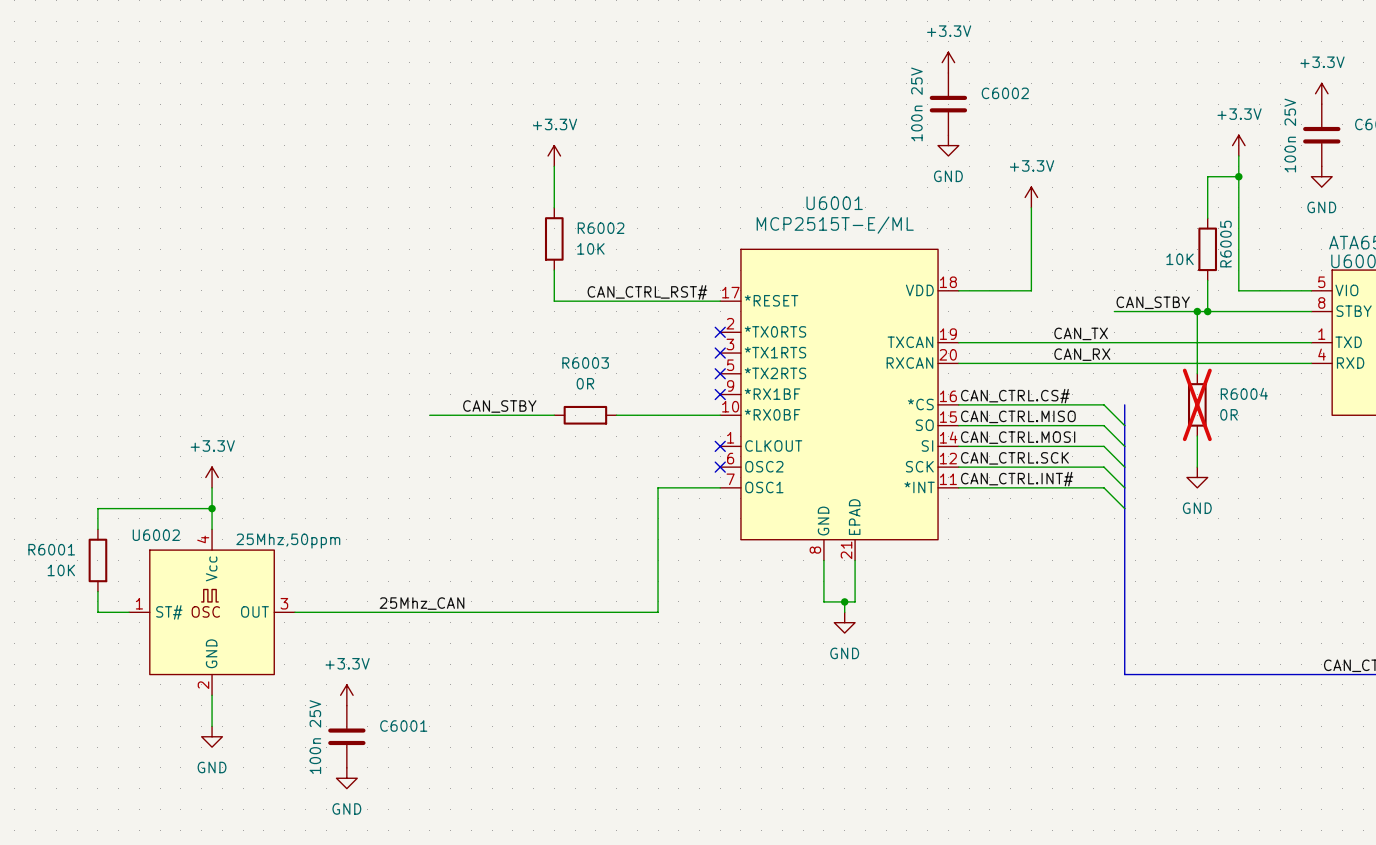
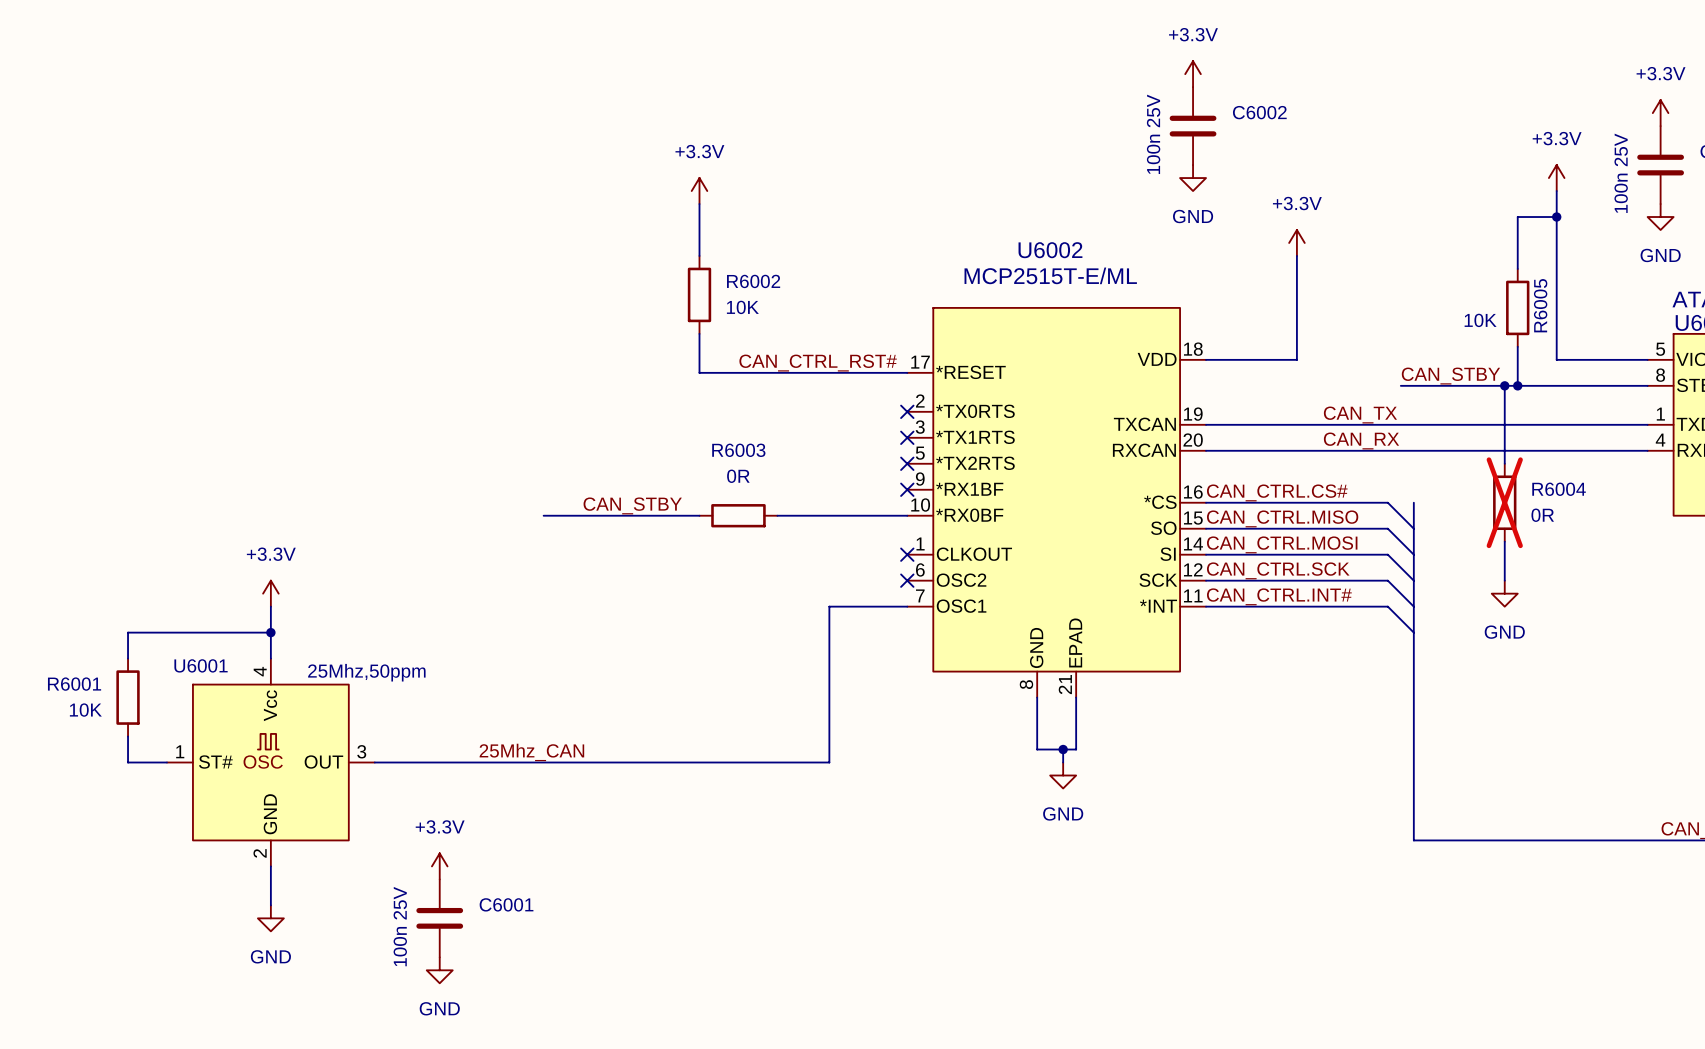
U6001 name: U6001 (834, 203) -> U6002 (1050, 250)
U6002 name: U6002 (156, 535) -> U6001 (201, 665)

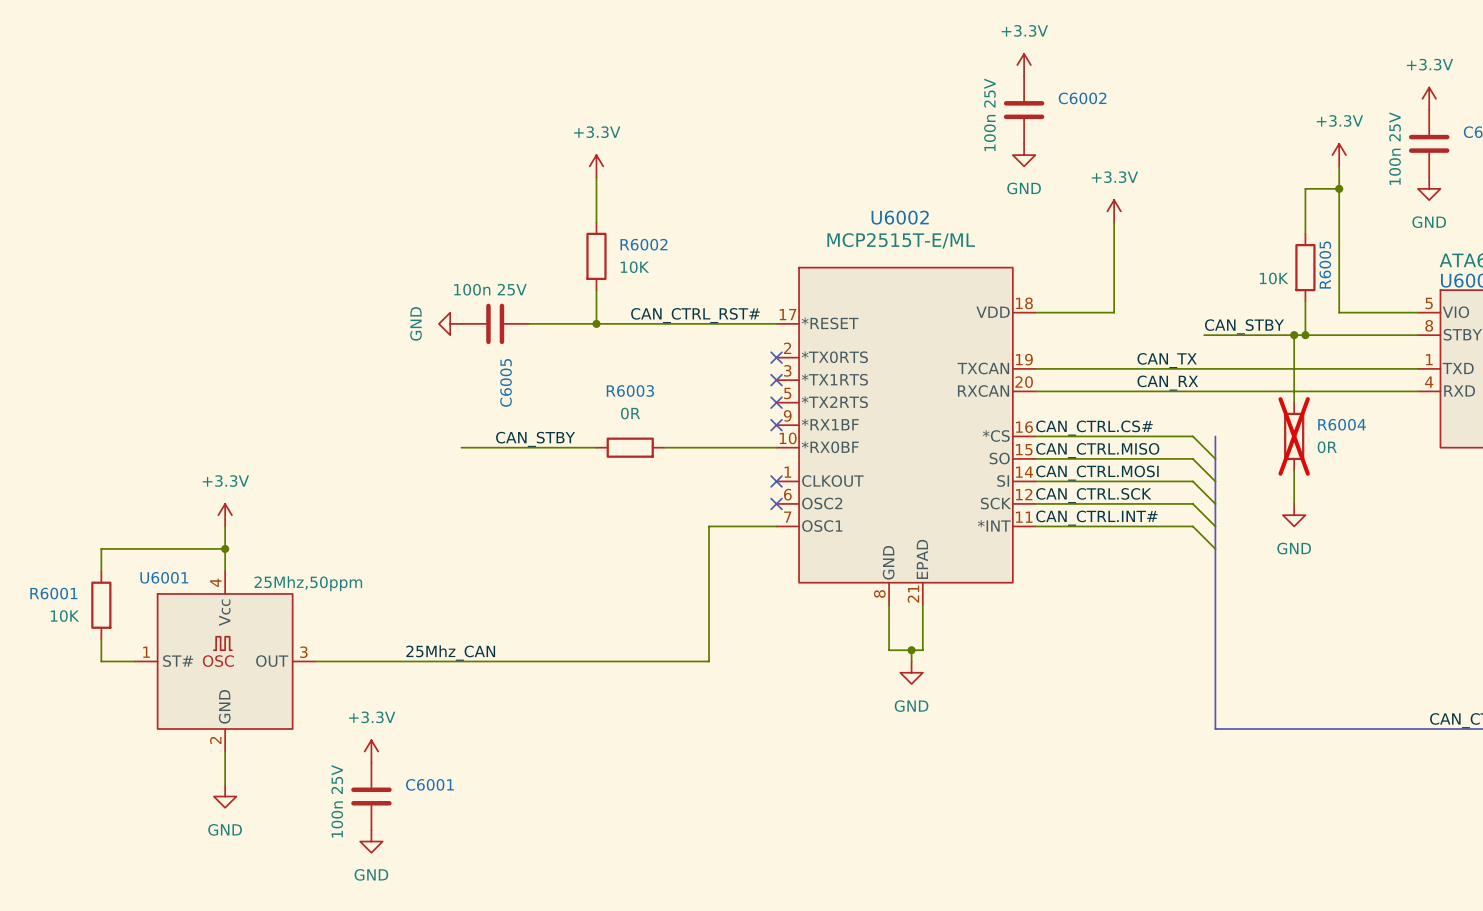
power symbol: none -> GND (450, 323)
C6005: none -> 100n 25V (495, 323)
wire: none -> (528, 323) (596, 323)
junction: none -> (596, 323)

